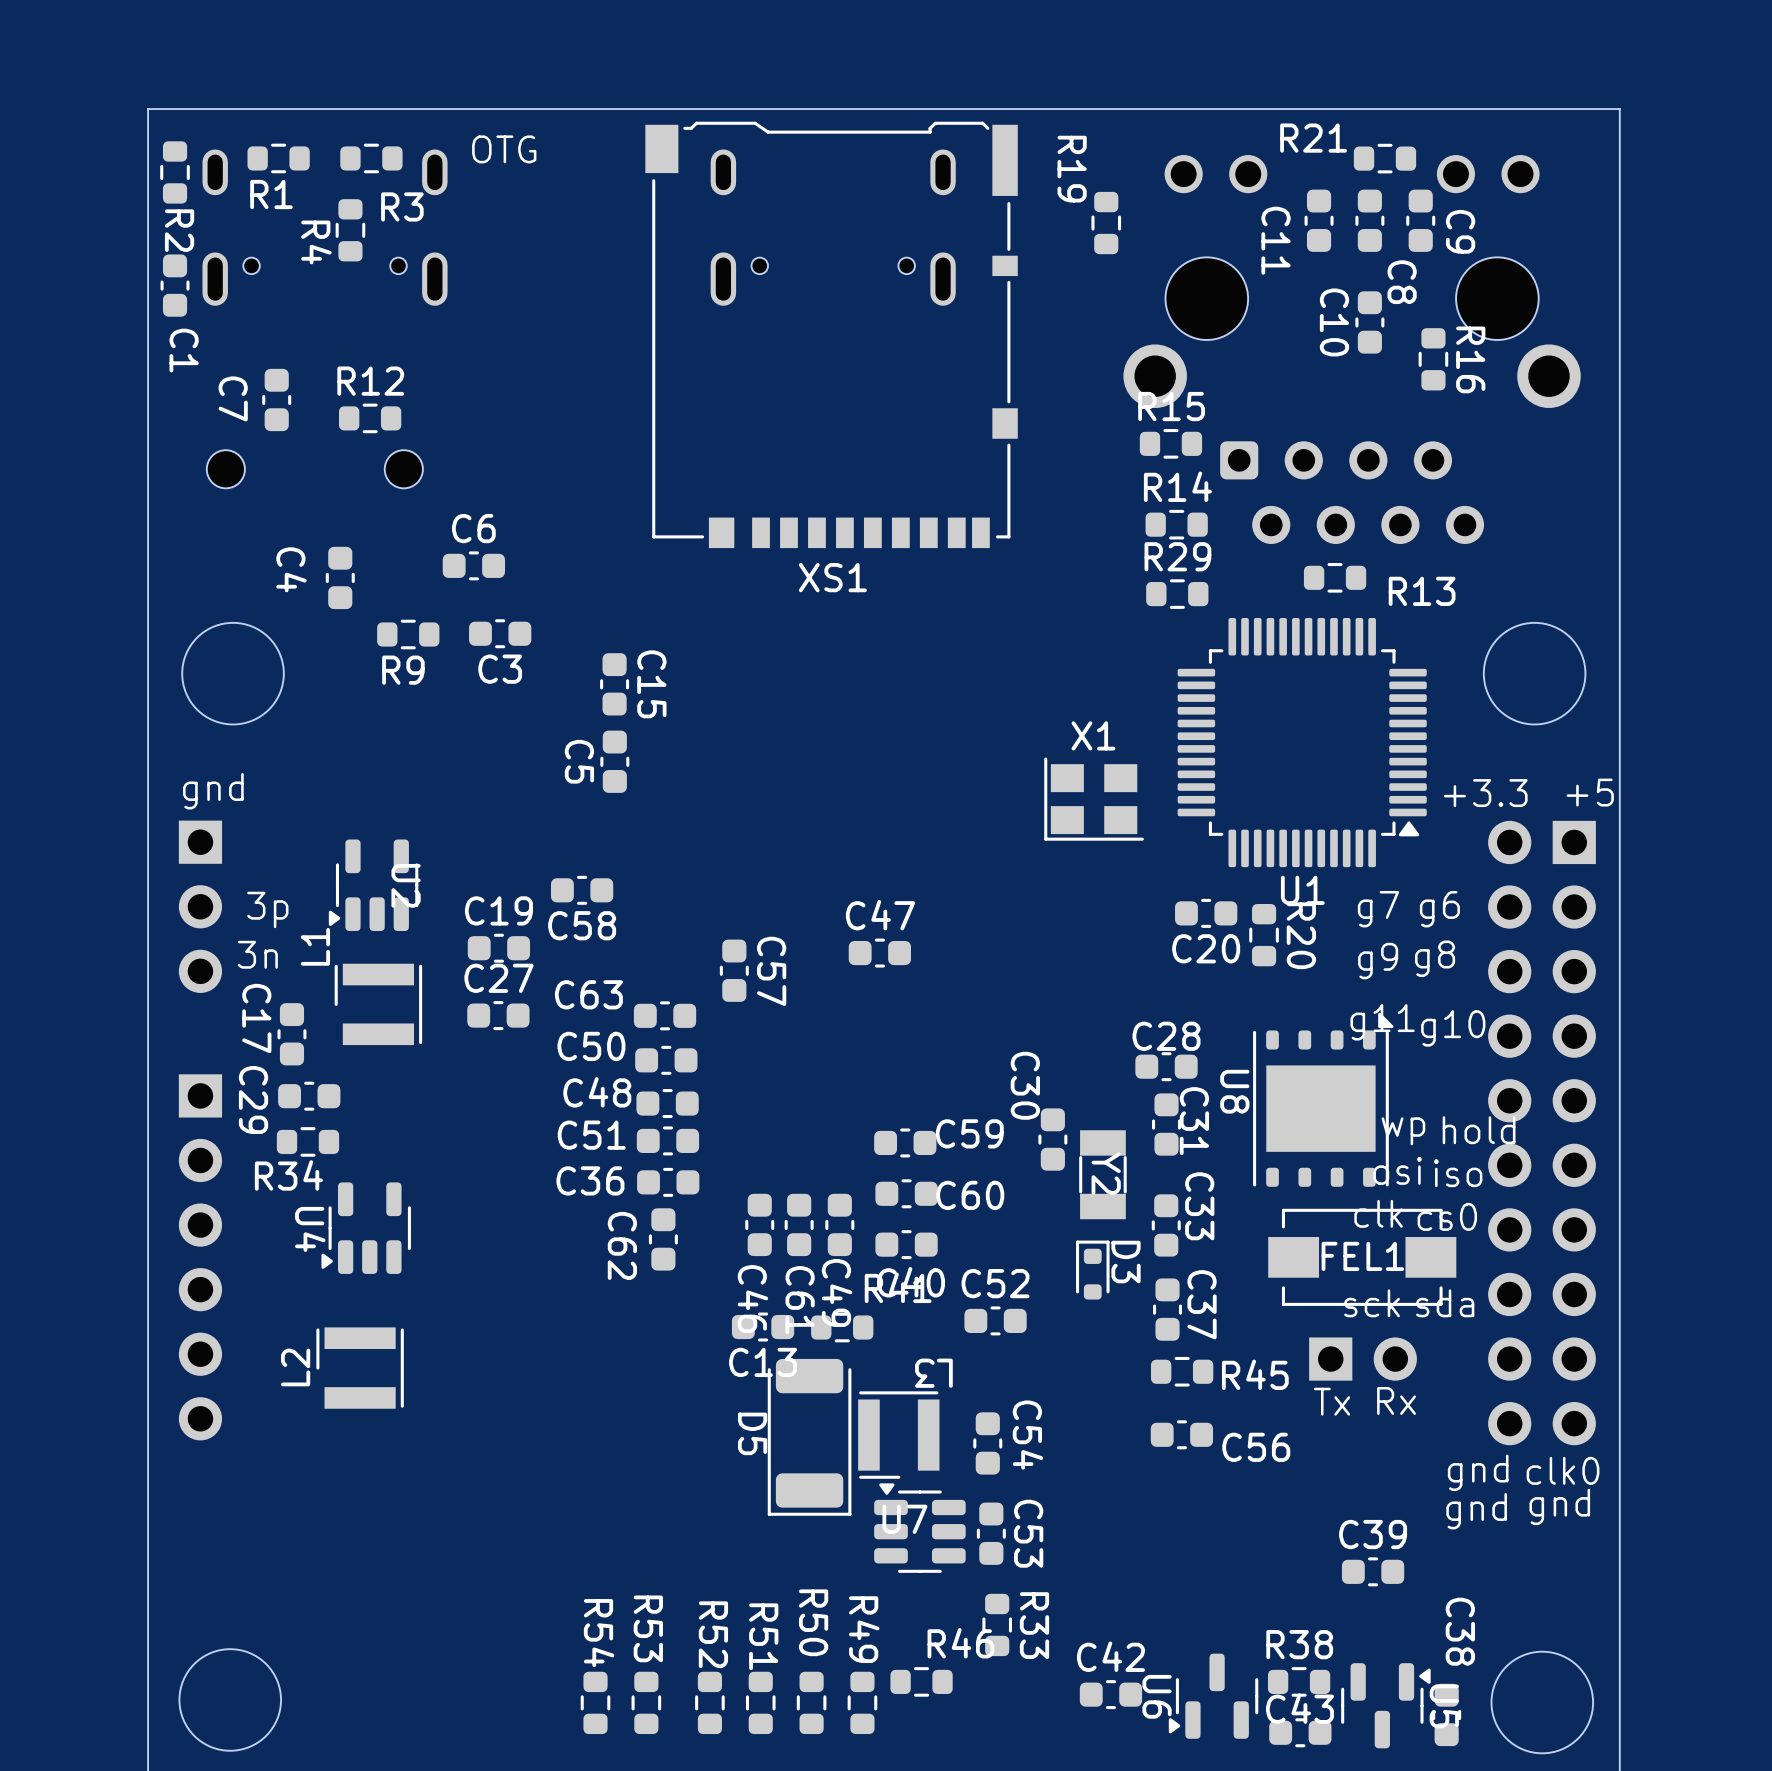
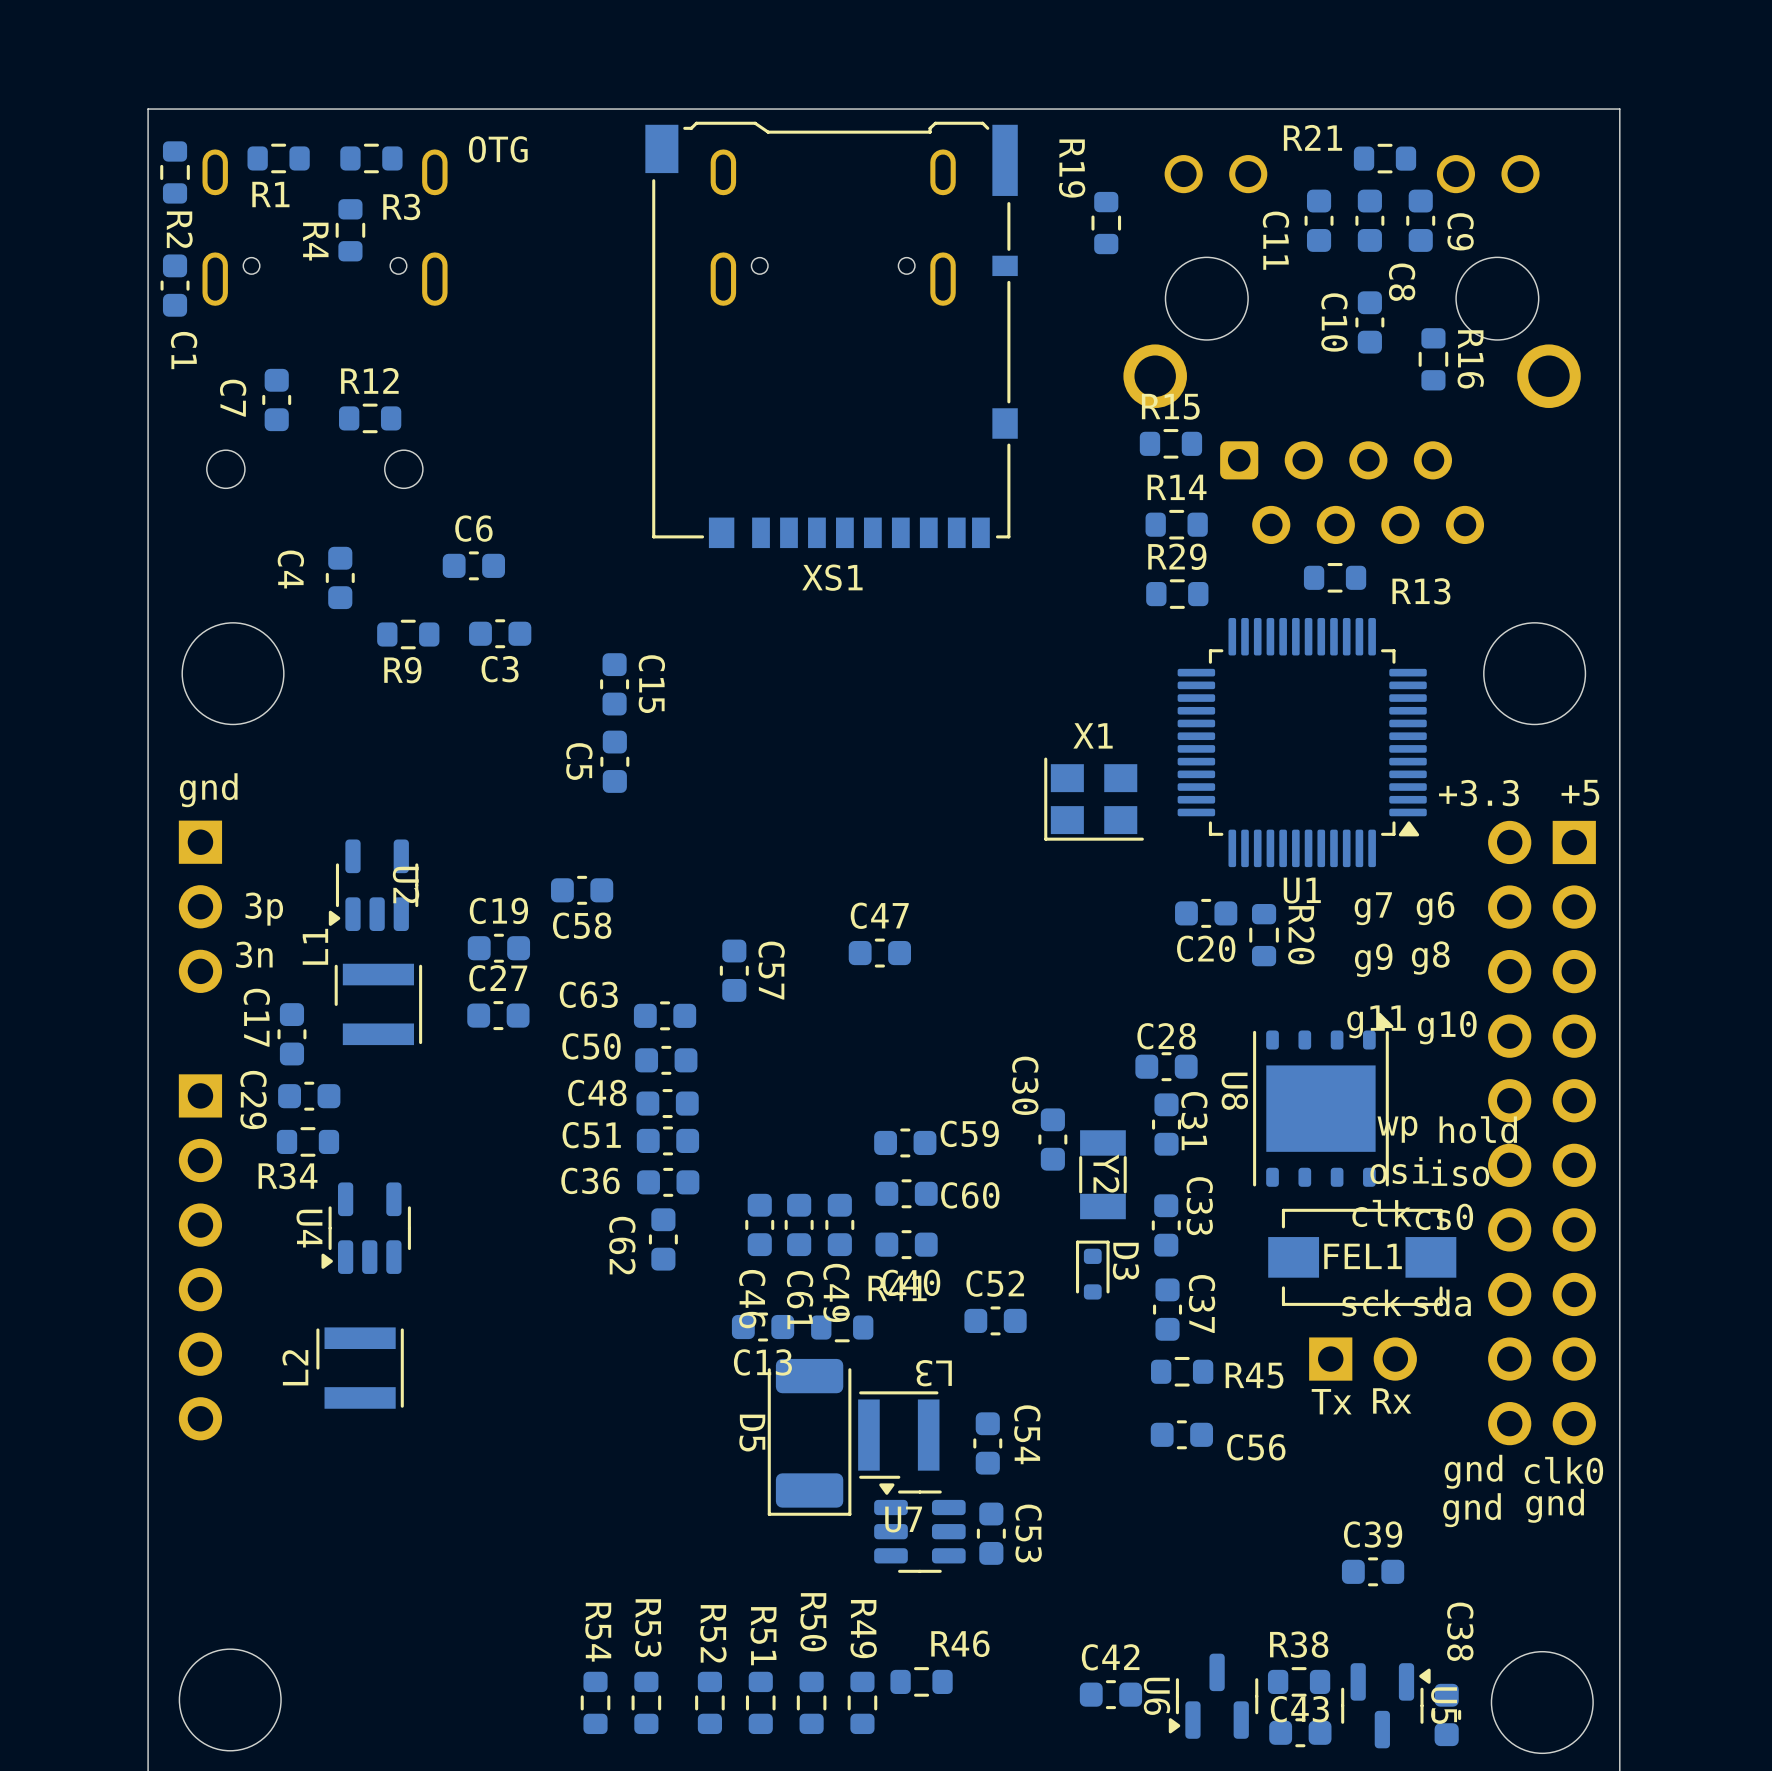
R33: (997, 1624) -> none

